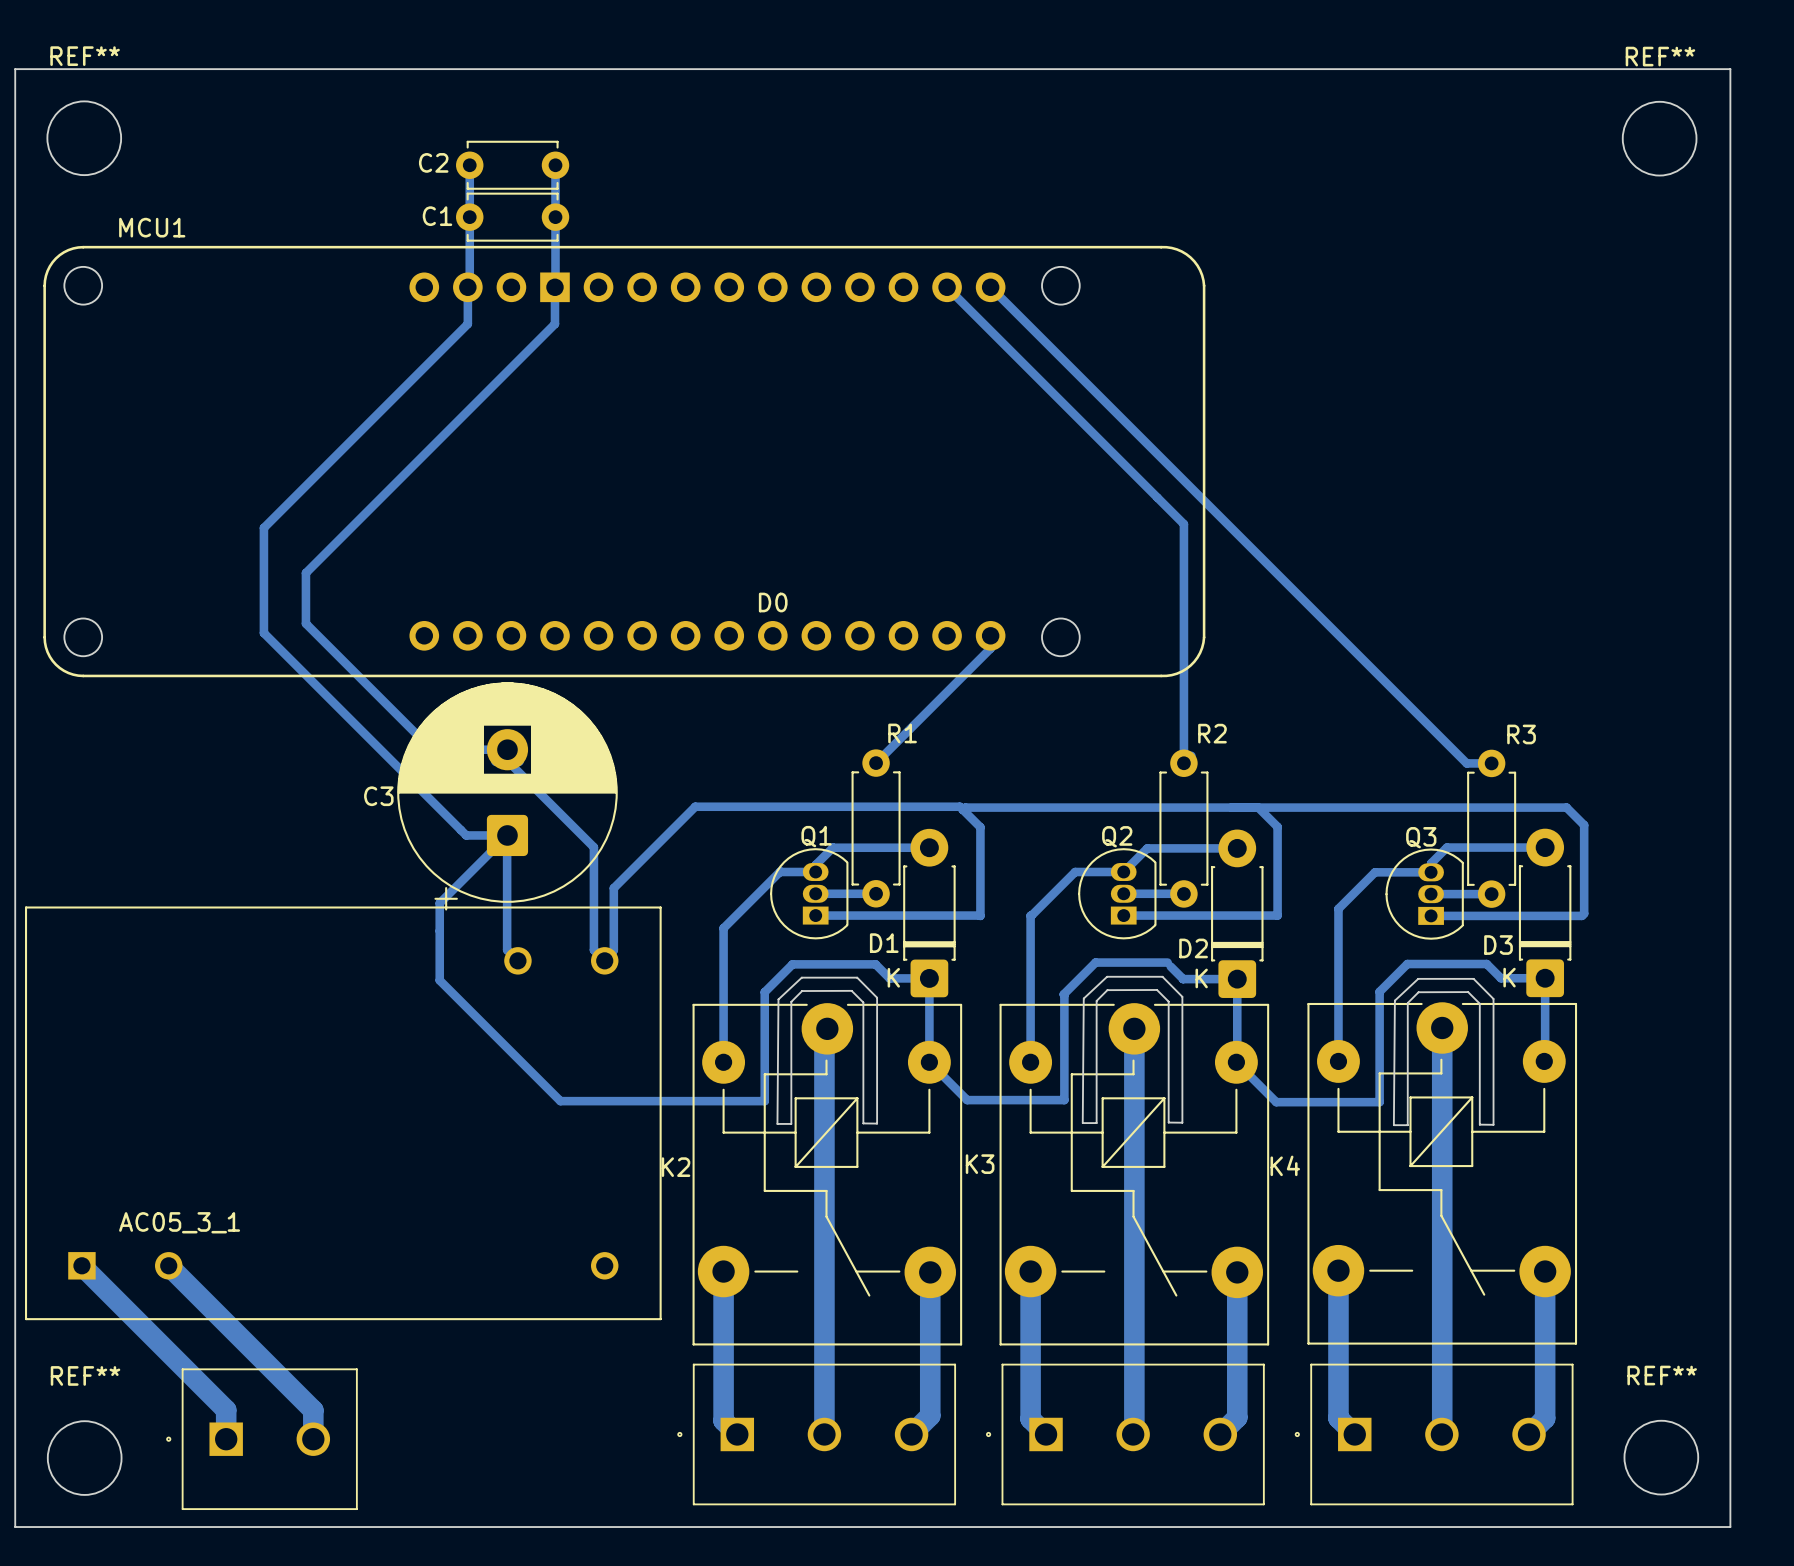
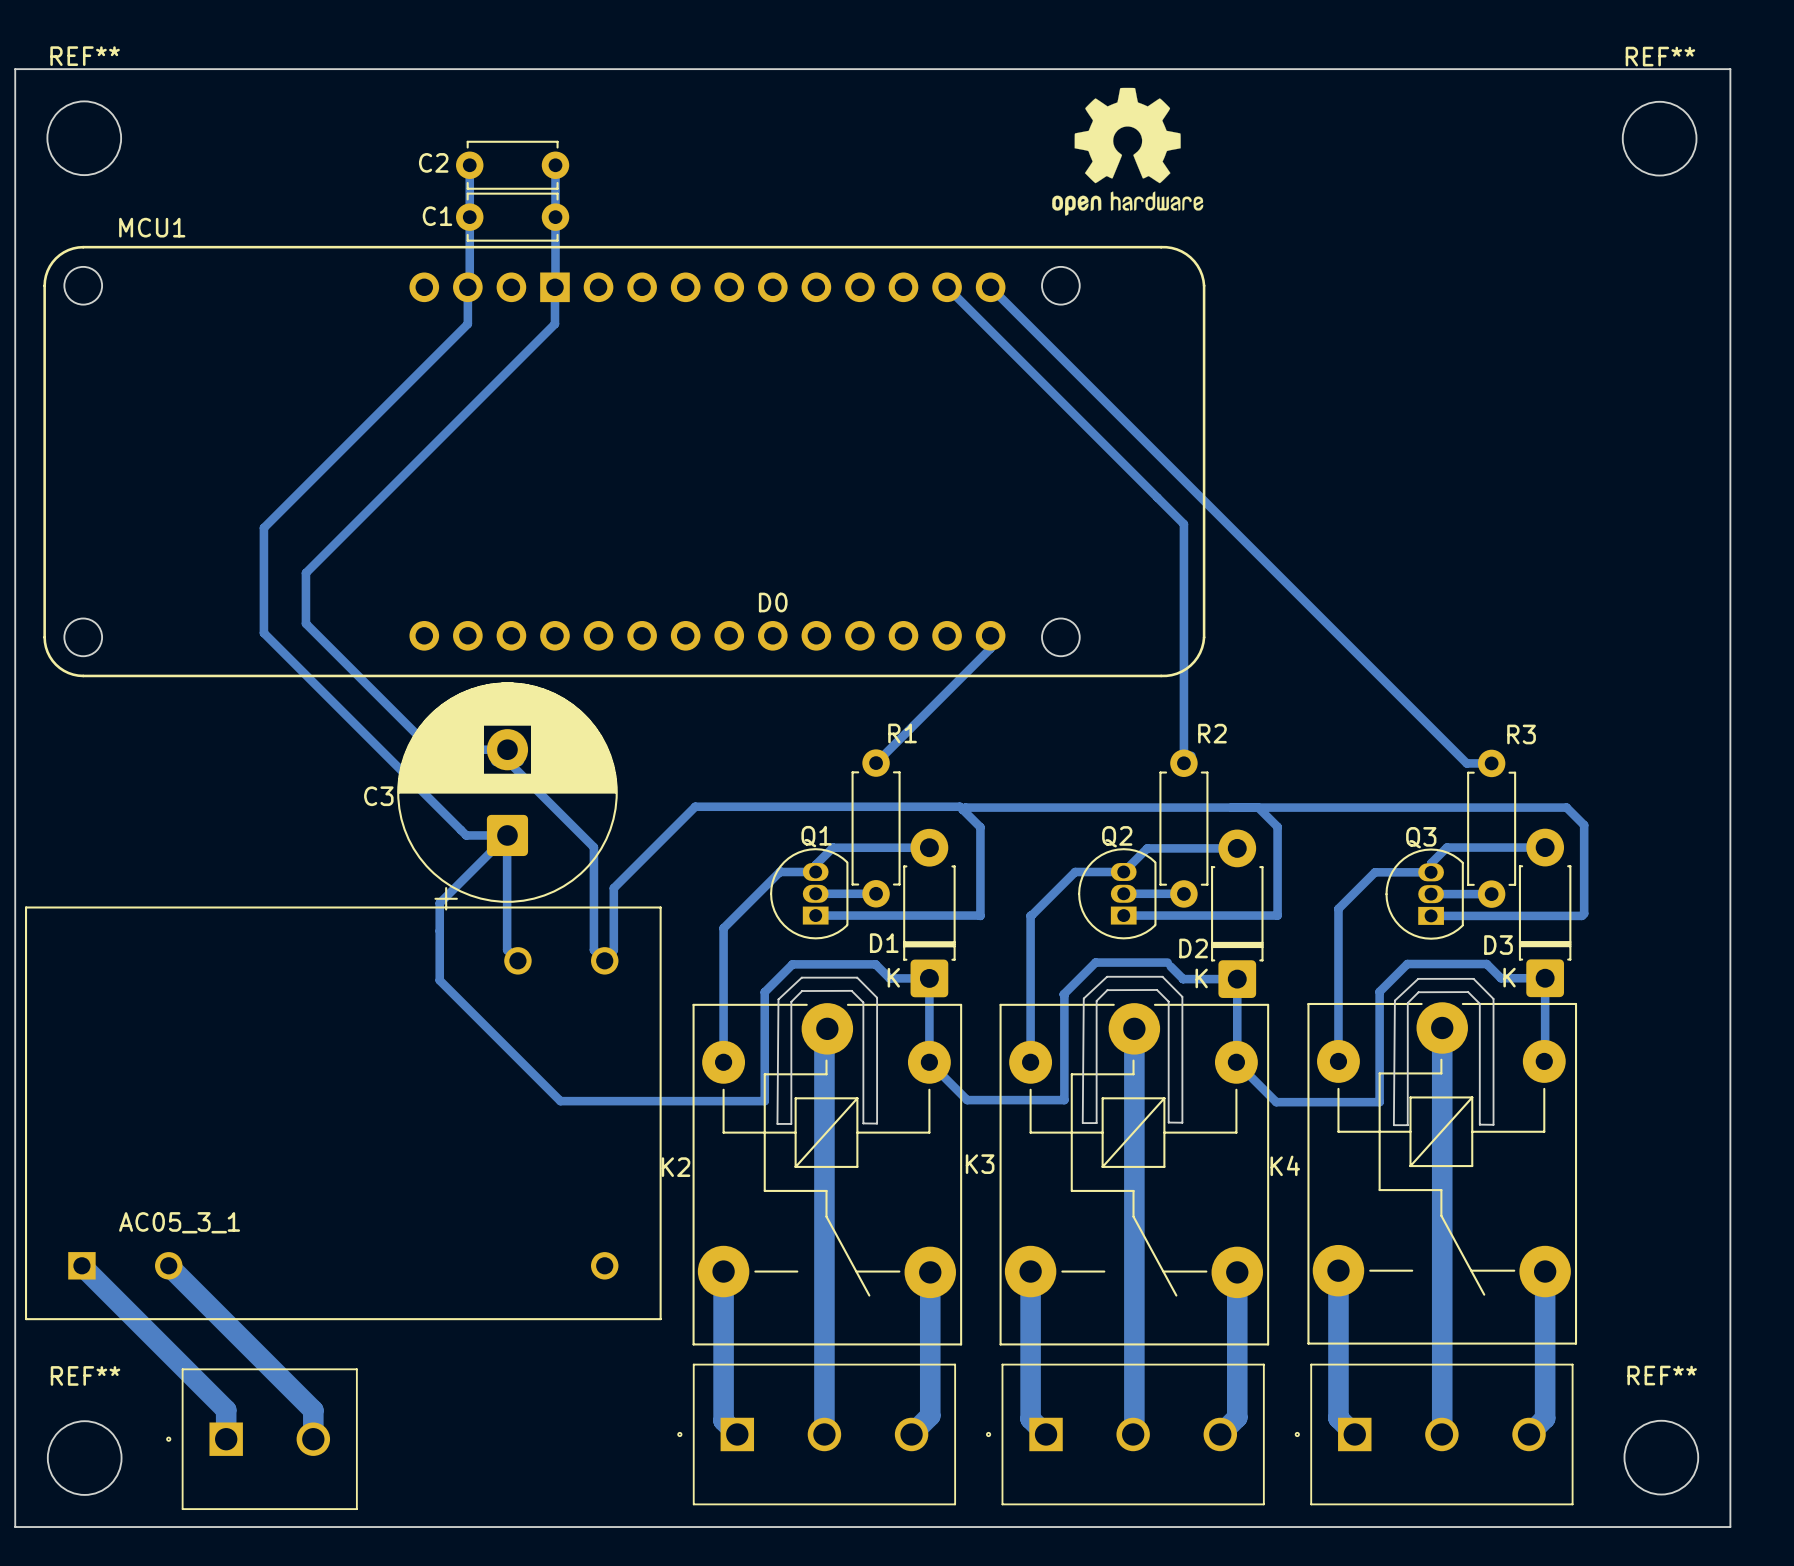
drawing: none -> [1052, 87, 1204, 216]

